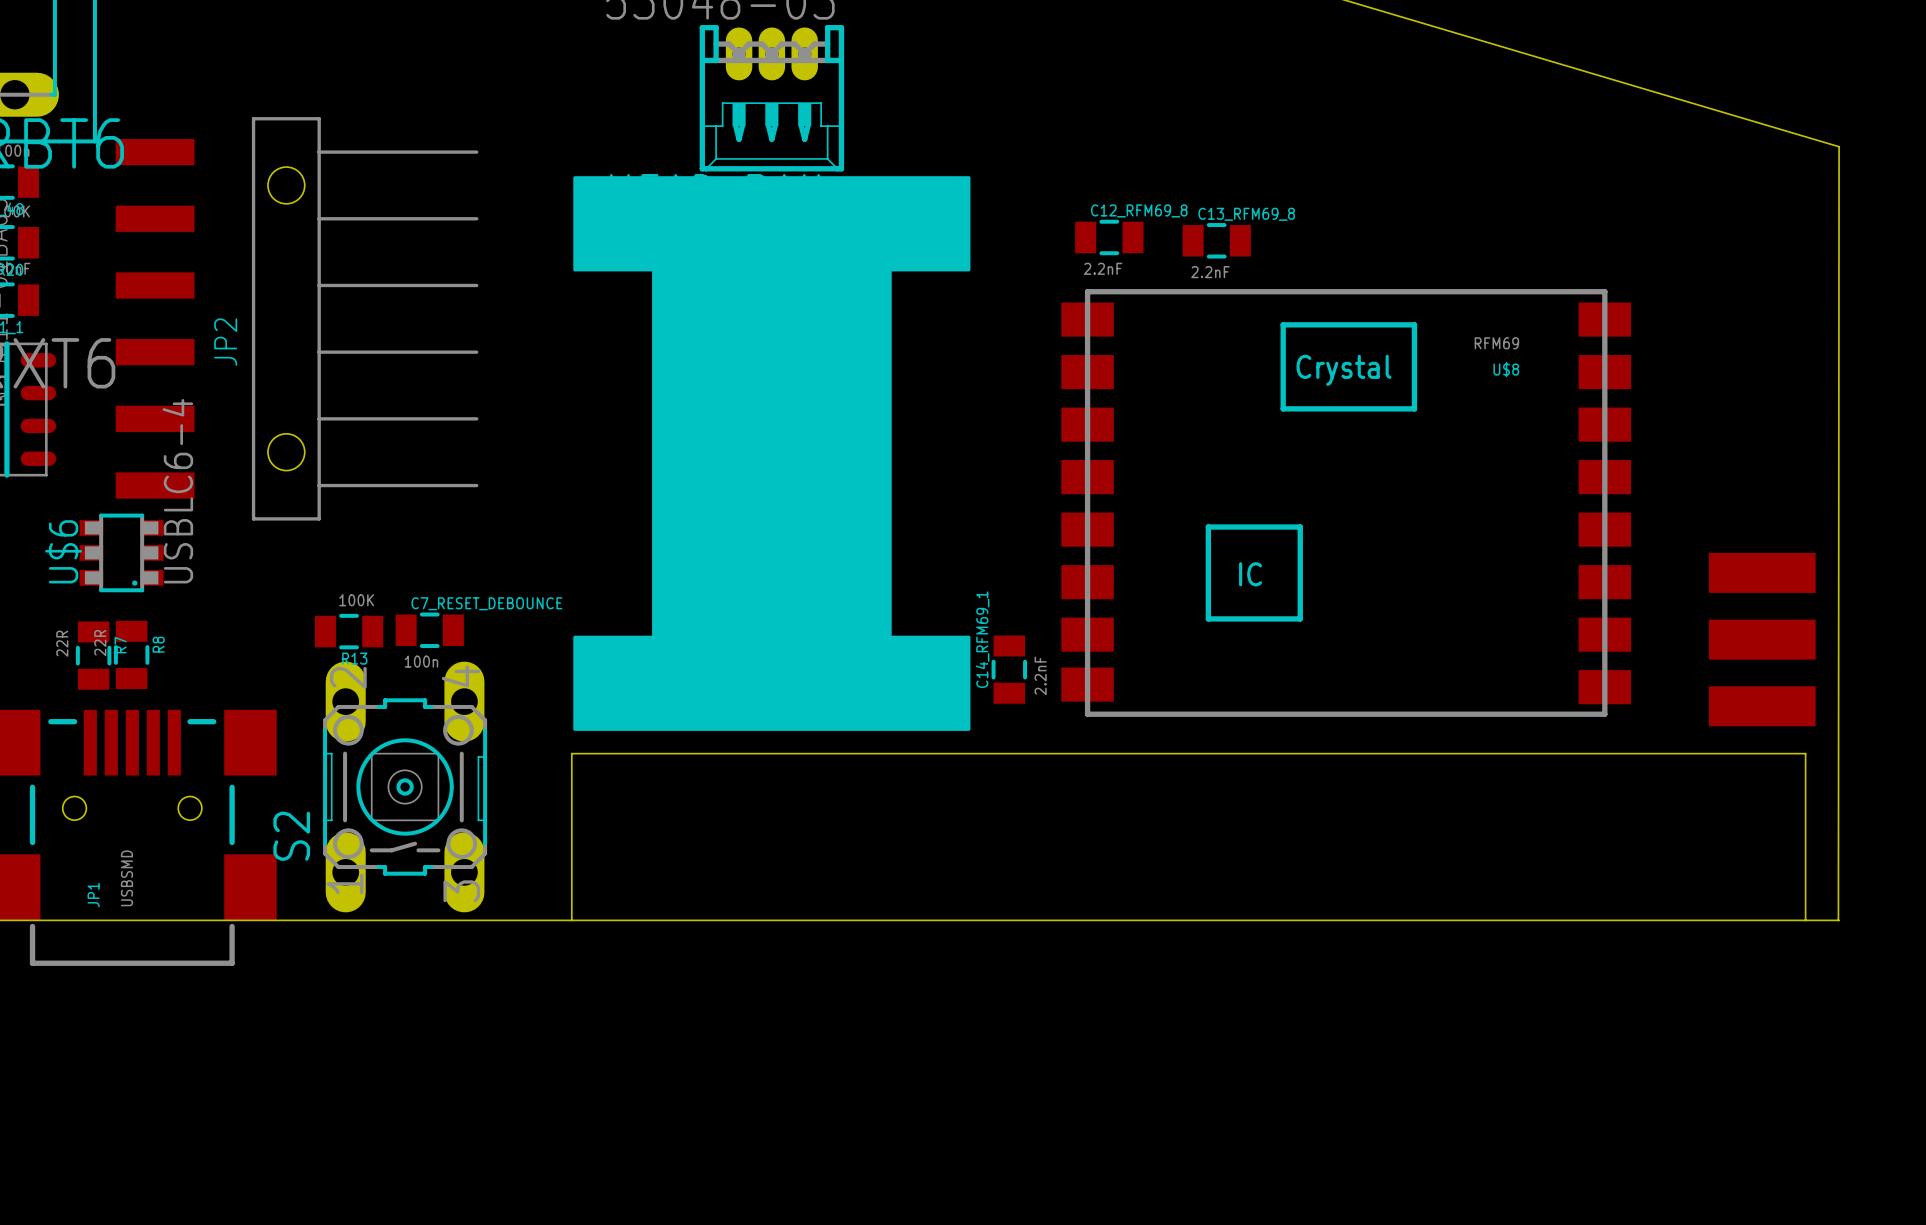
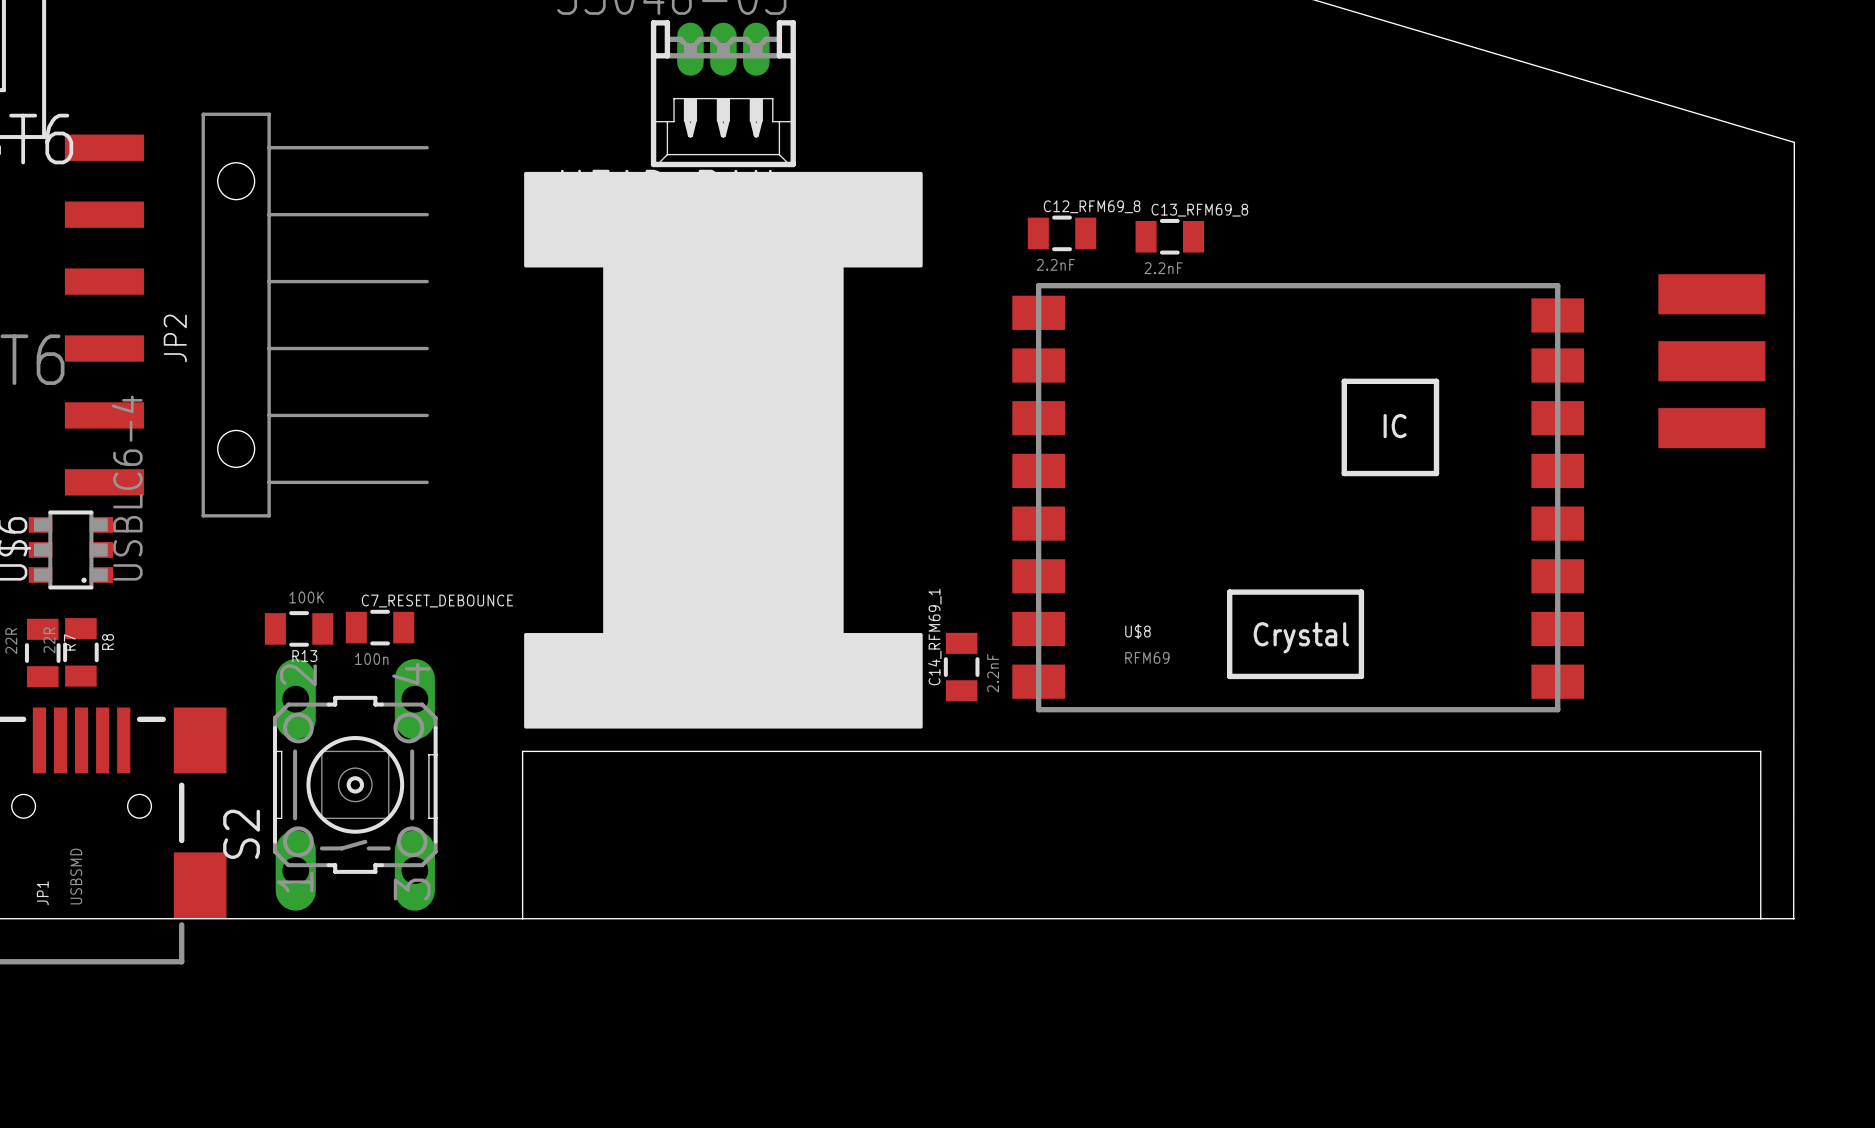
U$8 footprint: [1061, 289, 1632, 717] -> [1012, 283, 1585, 713]
U$8 value position: RFM69 (1496, 343) -> RFM69 (1147, 657)
U$8 name position: U$8 (1506, 369) -> U$8 (1137, 631)
part position: (1762, 639) -> (1711, 361)

